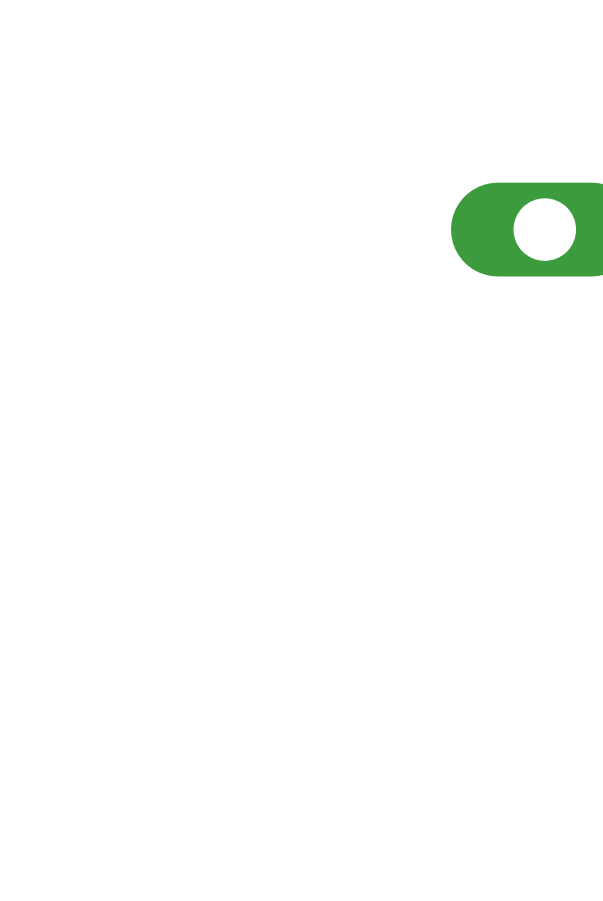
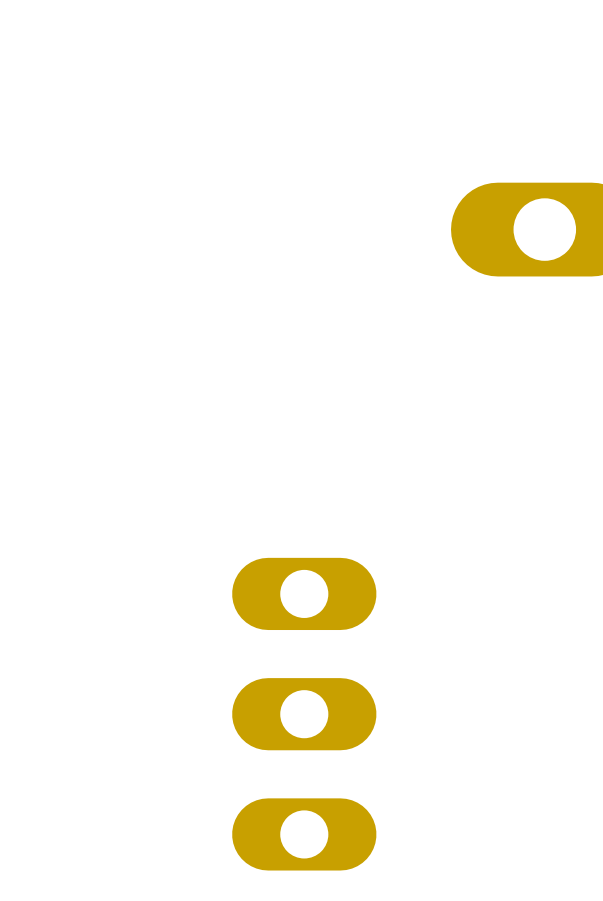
part: none -> (304, 714)

